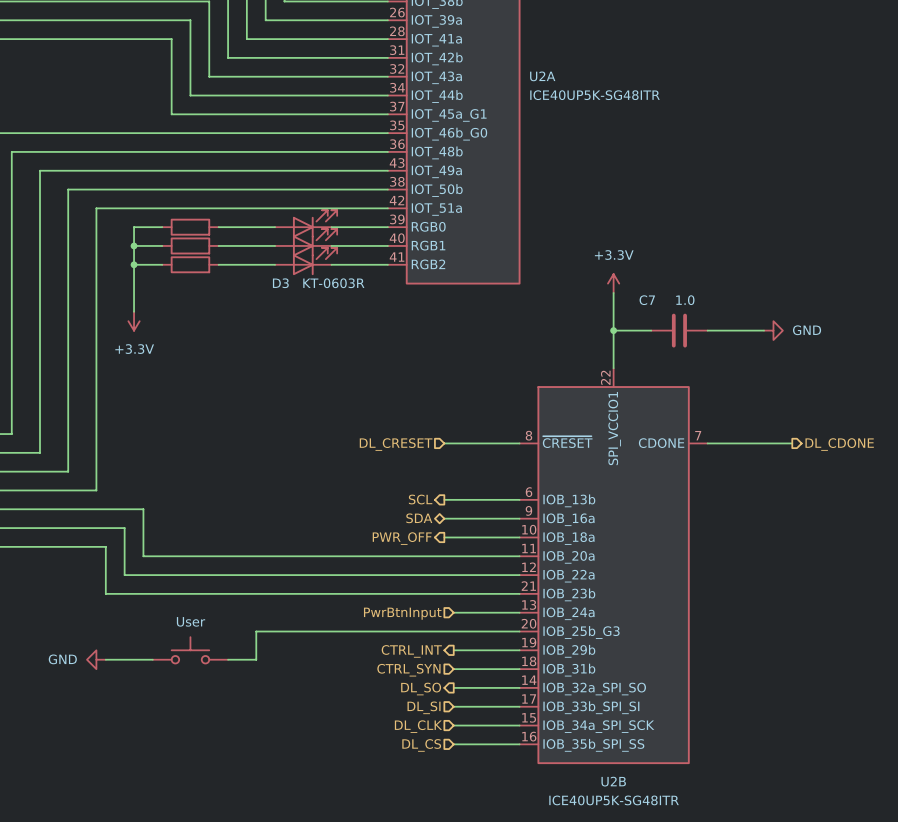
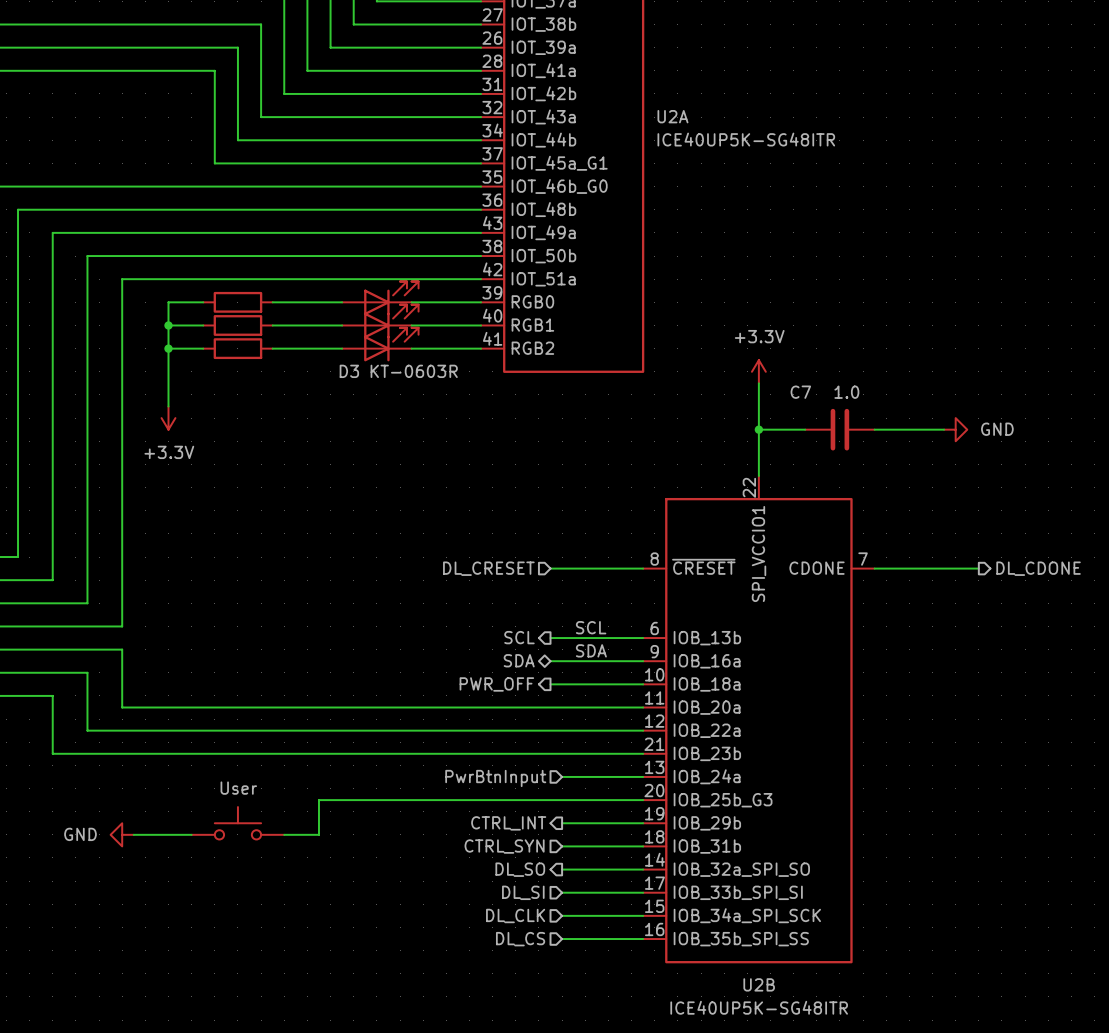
label: none -> SCL (591, 627)
wire: (96, 509) (143, 509) (143, 556) -> (122, 649) (122, 707) (180, 707)
label: none -> SDA (591, 650)
wire: (68, 528) (124, 528) (124, 575) -> (87, 672) (87, 730) (156, 730)
wire: (40, 546) (105, 546) (105, 593) -> (52, 695) (52, 753) (133, 753)

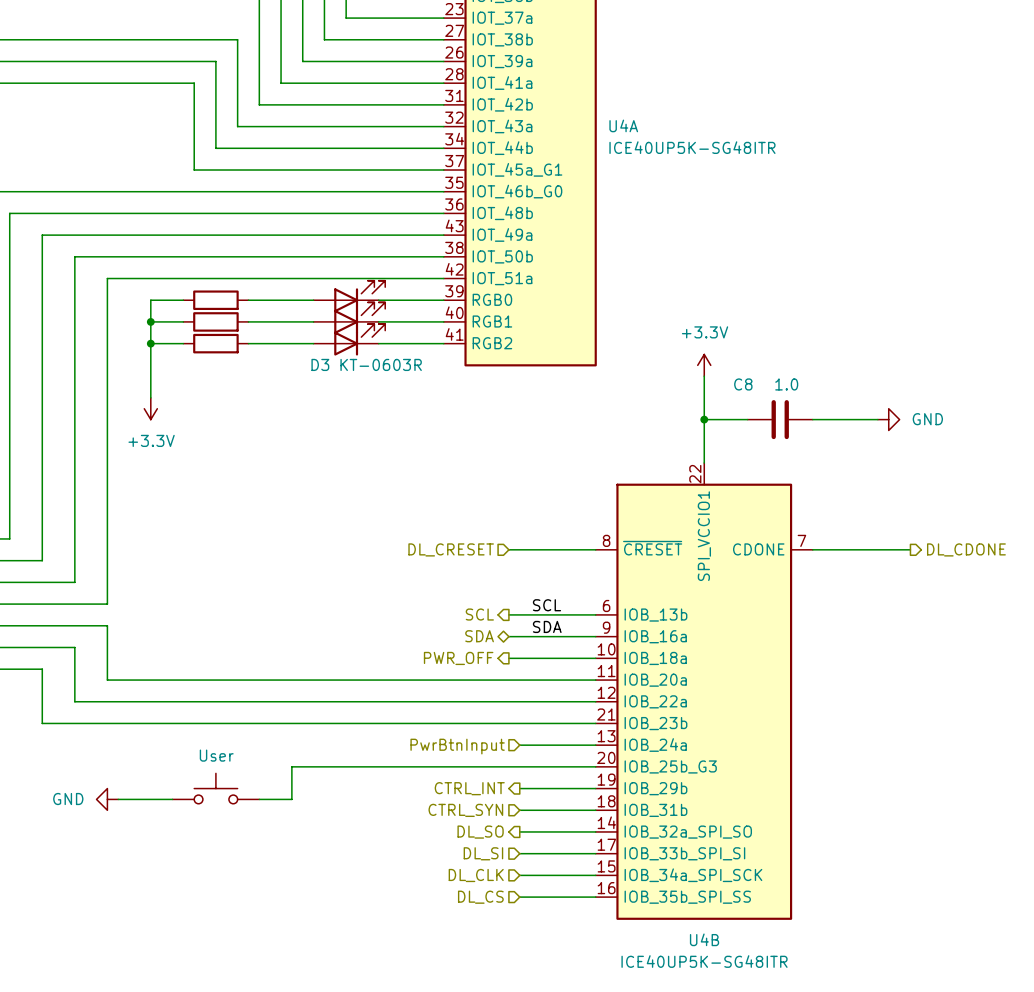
U2A name: U2A (672, 116) -> U4A (623, 125)
C7 name: C7 (800, 392) -> C8 (743, 384)
U2B name: U2B (759, 984) -> U4B (704, 939)

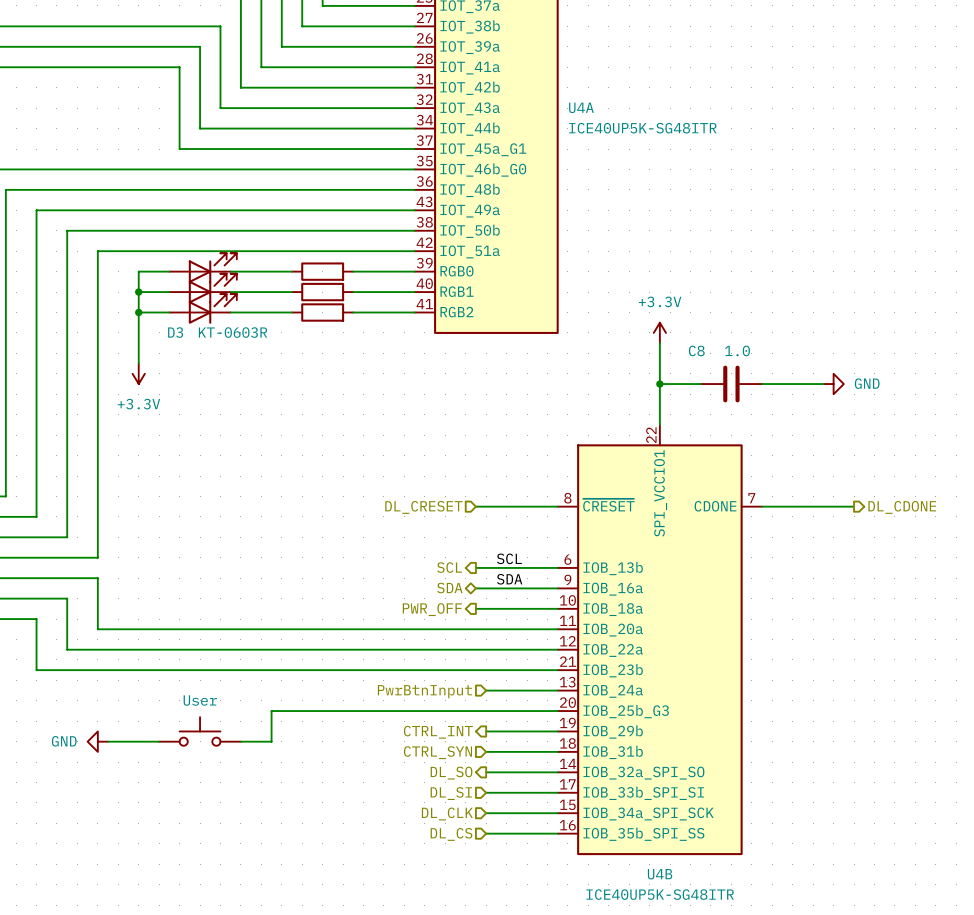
part symbol: [313, 280, 386, 313] -> [292, 262, 354, 281]
part symbol: [183, 290, 249, 310] -> [169, 253, 237, 283]
part symbol: [313, 302, 386, 334] -> [292, 282, 354, 302]
part symbol: [183, 312, 249, 332] -> [169, 273, 237, 304]
D3 position: (349, 339) -> (203, 308)
part position: (215, 343) -> (322, 312)

